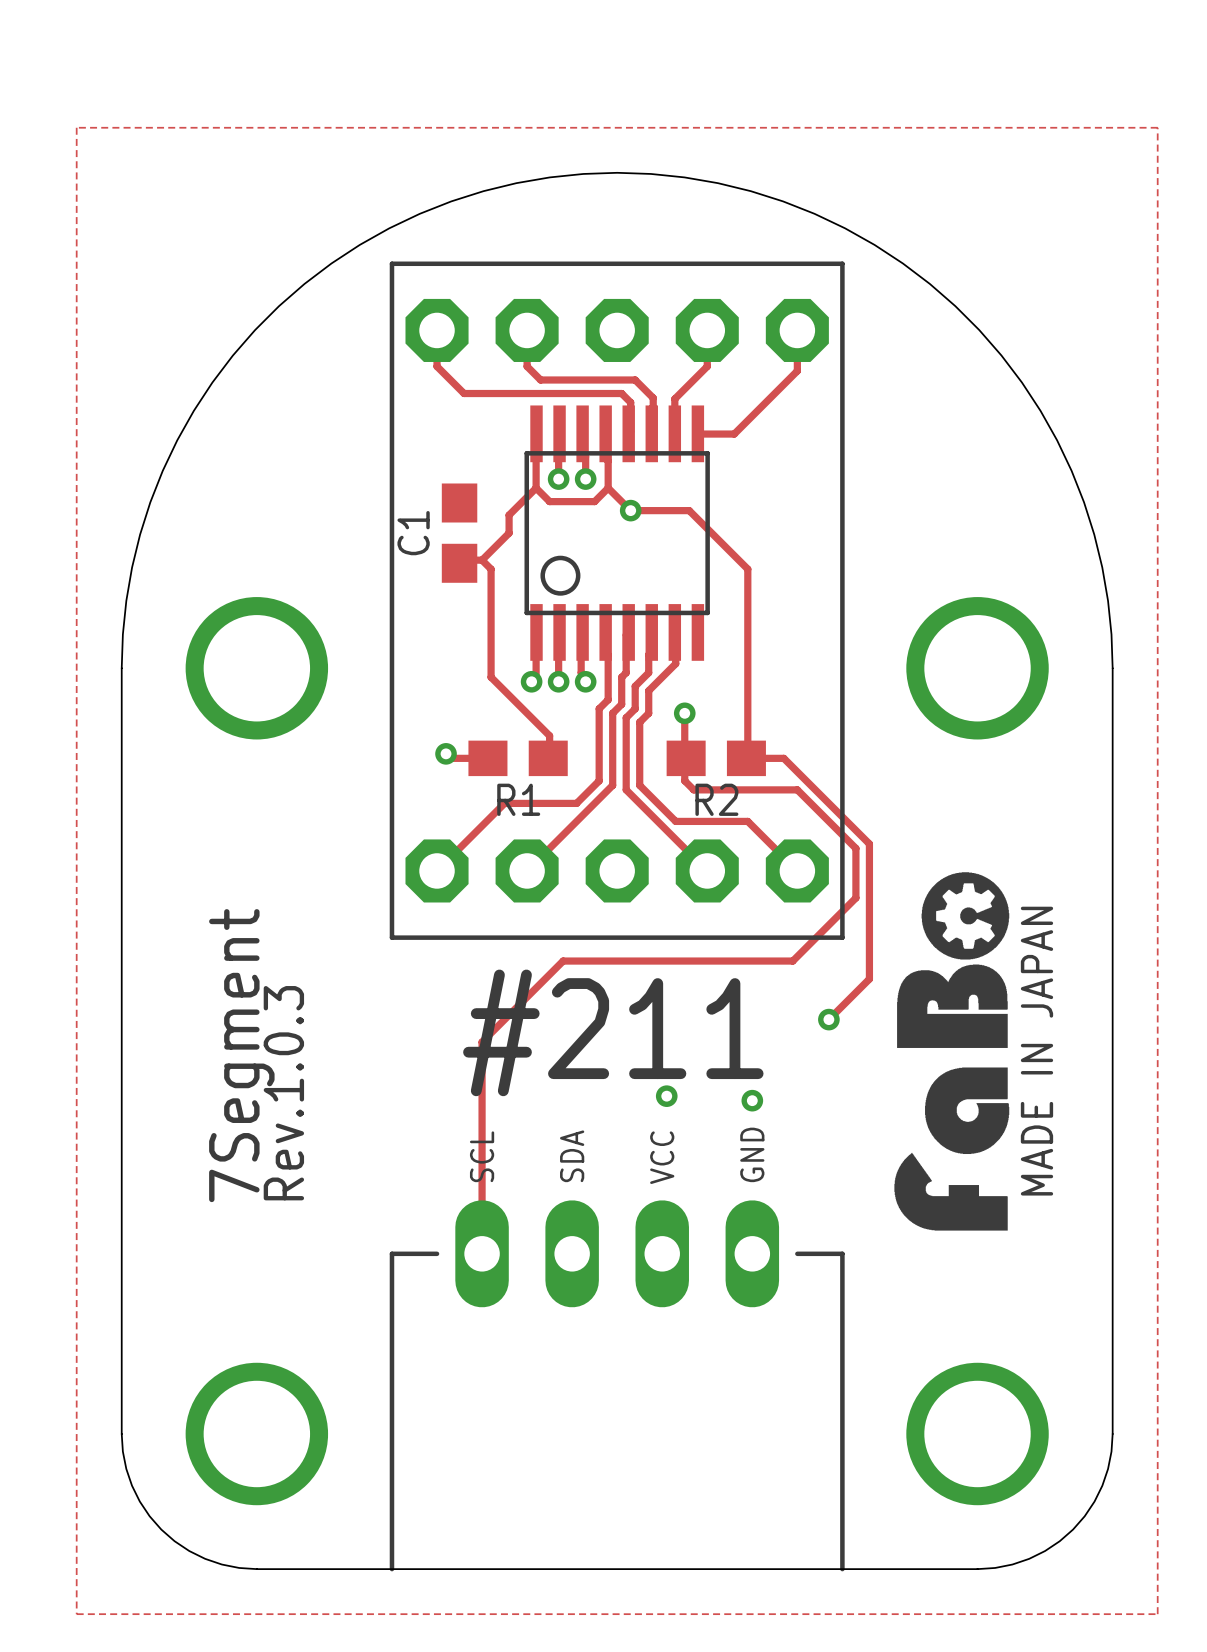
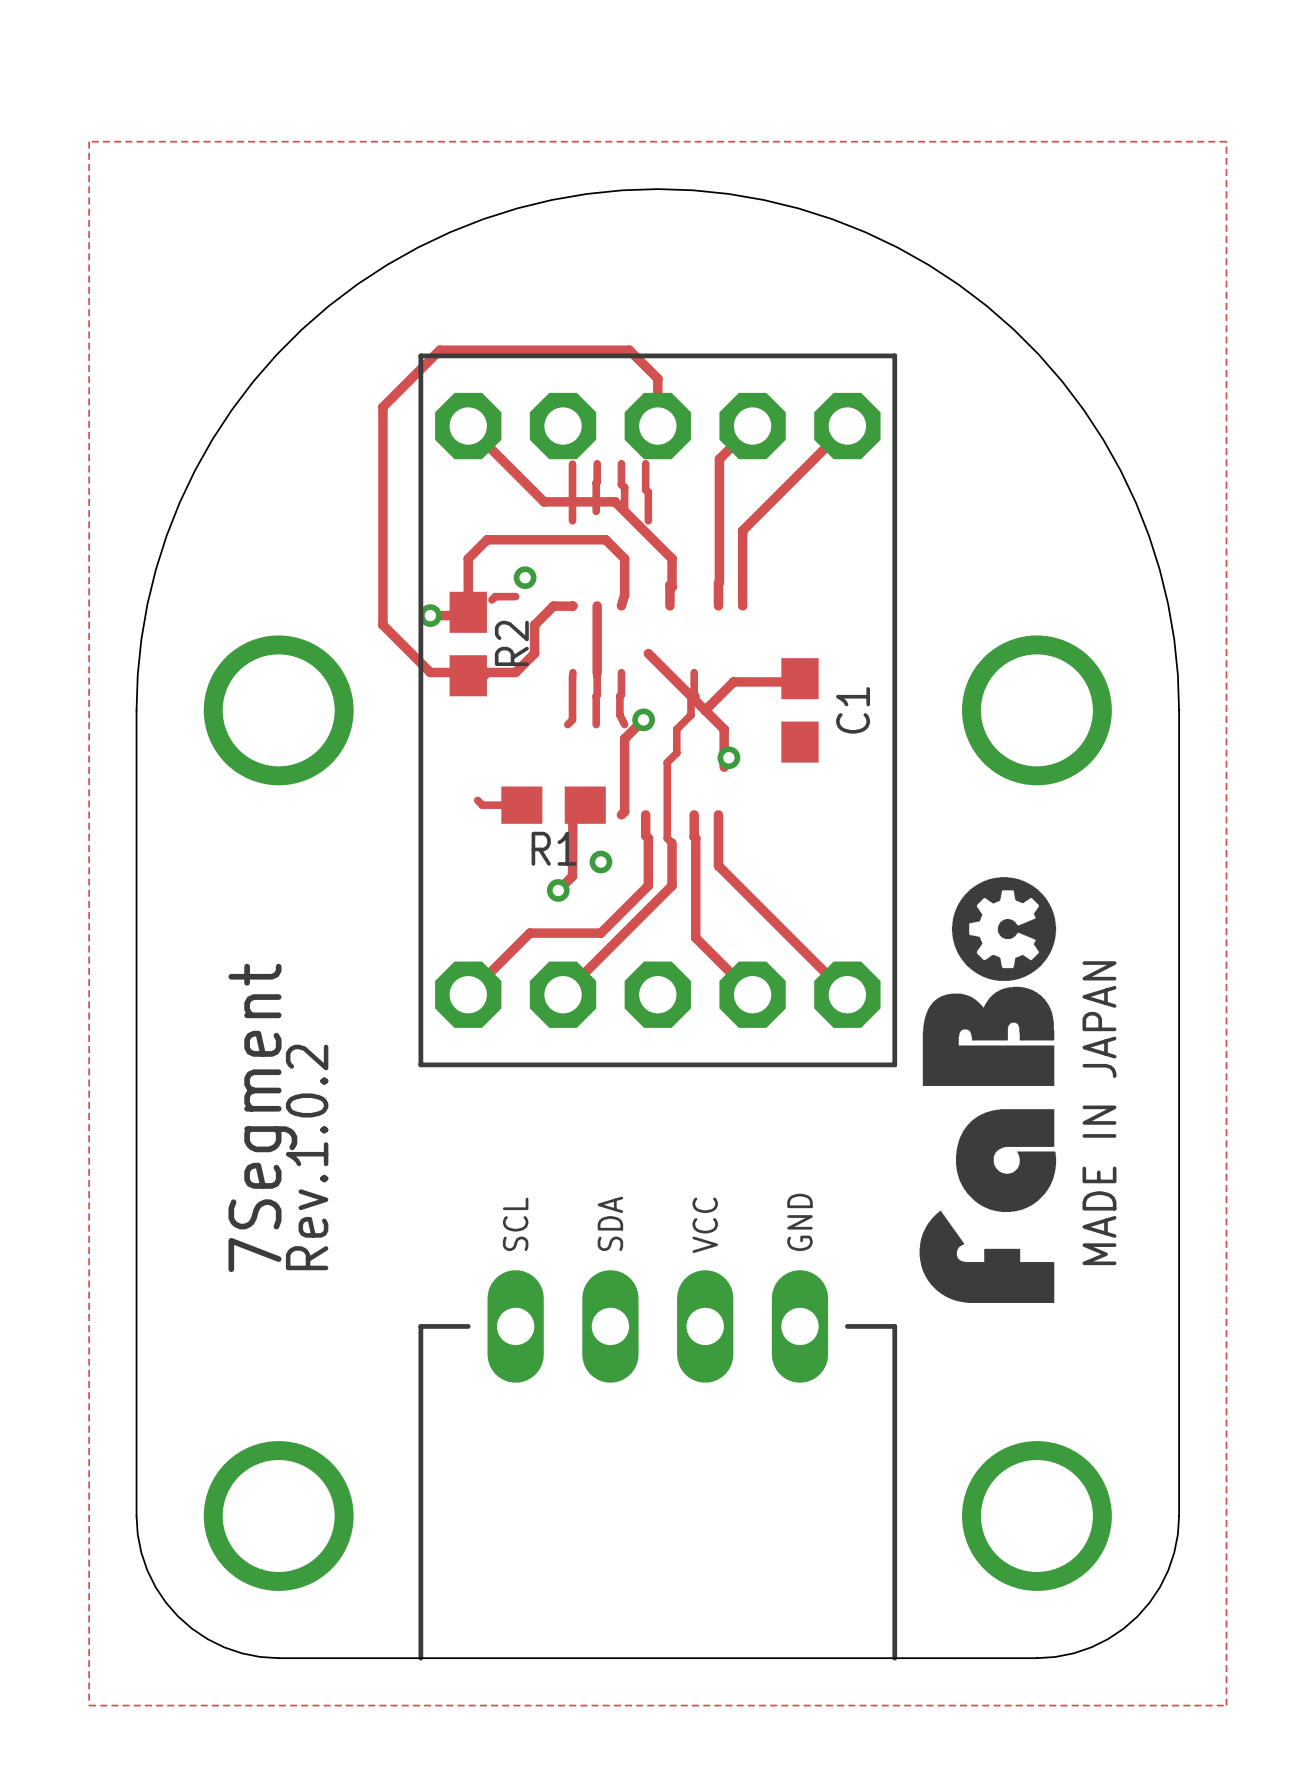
track: (437, 330) (437, 366) (464, 393) (621, 393) (630, 402) (630, 431) (628, 433) -> none
track: (527, 330) (527, 366) (540, 380) (635, 380) (653, 398) (651, 433) -> none
track: (707, 330) (707, 366) (674, 398) (674, 433) -> none
track: (797, 330) (797, 370) (734, 434) (698, 434) -> none
track: none -> (468, 426) (544, 501) (615, 501) (672, 558) (669, 605)
track: none -> (657, 426) (657, 378) (629, 350) (439, 350) (382, 407) (382, 625) (430, 672) (464, 672) (468, 675) (483, 675) (487, 672) (515, 672) (534, 653) (534, 625) (553, 606) (572, 606)
track: none -> (752, 426) (719, 459) (718, 605)
track: none -> (847, 426) (742, 530) (742, 605)
via: (558, 479) -> none
via: (585, 479) -> none
via: (630, 510) -> none
C1 name position: C1 (413, 533) -> C1 (853, 710)
C1 position: (459, 533) -> (799, 710)
part: (617, 533) -> none
via: none -> (525, 577)
track: none -> (597, 605) (597, 672)
track: none -> (621, 605) (624, 594) (624, 558) (605, 539) (487, 539) (468, 558) (468, 612) (464, 615) (430, 615)
via: none -> (430, 615)
part position: (617, 600) -> (657, 710)
track: none -> (648, 653) (724, 729) (724, 767)
track: (605, 632) (605, 652) (608, 654) (608, 699) (599, 708) (599, 780) (576, 803) (504, 803) (437, 870) -> none
track: (628, 632) (626, 634) (626, 672) (621, 677) (621, 704) (612, 713) (612, 785) (527, 870) -> none
track: (674, 632) (675, 663) (648, 690) (648, 713) (639, 722) (639, 785) (675, 821) (747, 821) (797, 870) -> none
track: none -> (799, 678) (796, 681) (733, 681) (705, 710)
track: none -> (643, 719) (624, 738) (624, 811) (621, 814)
via: (531, 681) -> none
via: (558, 681) -> none
via position: (585, 681) -> (643, 719)
track: (684, 713) (684, 780) (693, 789) (797, 789) (855, 848) (855, 897) (792, 961) (563, 961) (482, 1042) (482, 1253) -> none
via: (446, 753) -> none
track: (548, 758) (549, 735) (491, 677) (491, 569) (482, 560) (509, 533) (509, 515) (536, 488) (549, 501) (594, 501) (608, 488) (630, 510) (689, 510) (747, 569) (746, 758) (783, 758) (869, 843) (869, 979) (828, 1019) -> none
R2 rotation: 0° (716, 758) -> 90° clockwise (468, 644)
R2 position: (716, 758) -> (468, 644)
track: none -> (572, 814) (572, 876) (558, 890)
track: none -> (645, 814) (645, 835) (648, 838) (648, 885) (600, 933) (529, 933) (468, 994)
track: none -> (694, 814) (695, 937) (752, 994)
track: none -> (718, 814) (718, 865) (847, 994)
track: (630, 794) (707, 870) -> (672, 843) (672, 885) (563, 994)
via: none -> (600, 862)
via: none -> (558, 890)
drawing shape: [894, 872, 1010, 1231] -> [919, 877, 1057, 1303]
via: (828, 1019) -> none
text: #211 (613, 1032) -> none
text: Rev.1.0.3 (283, 1093) -> Rev.1.0.2 (307, 1157)
via: (666, 1096) -> none
via: (752, 1100) -> none

